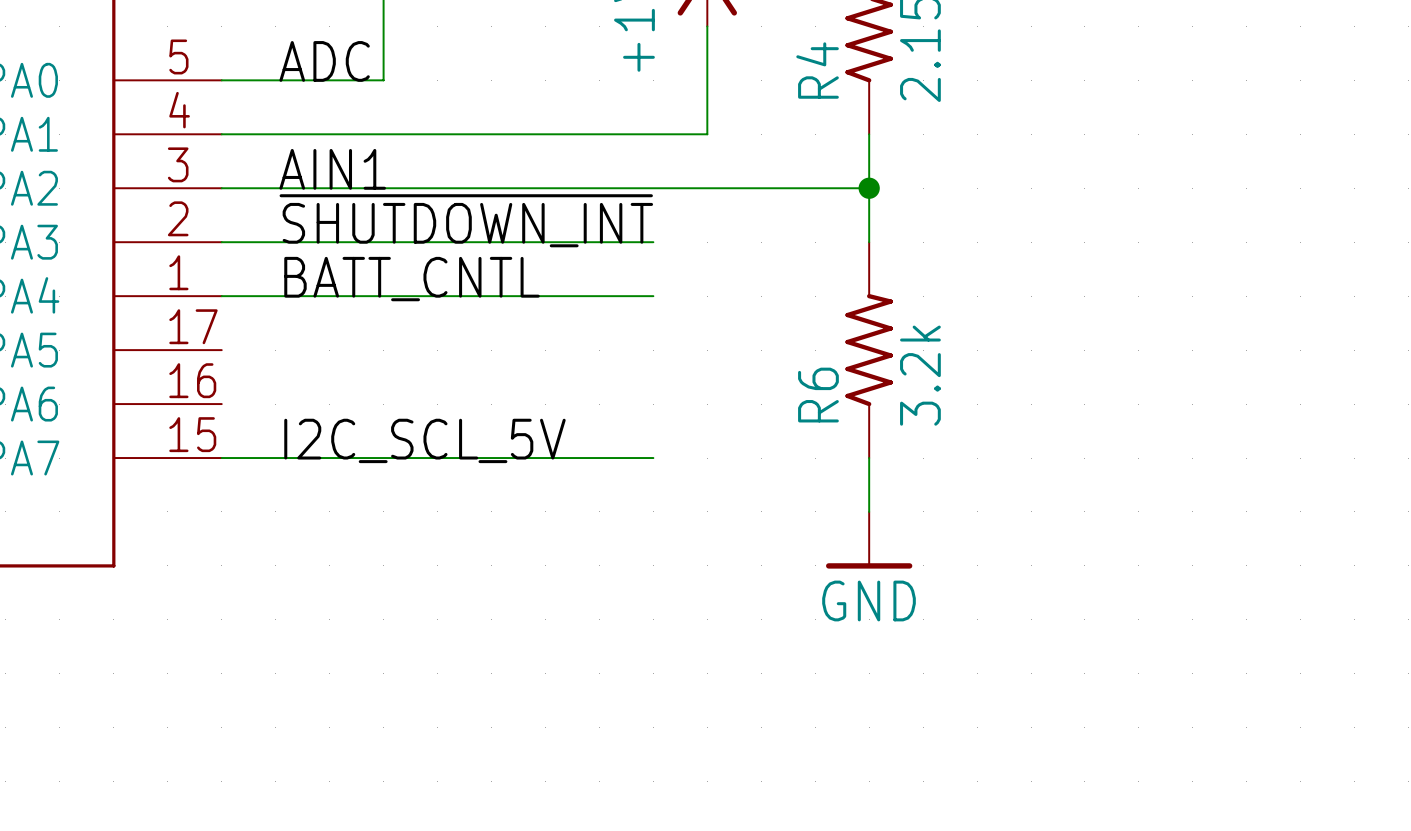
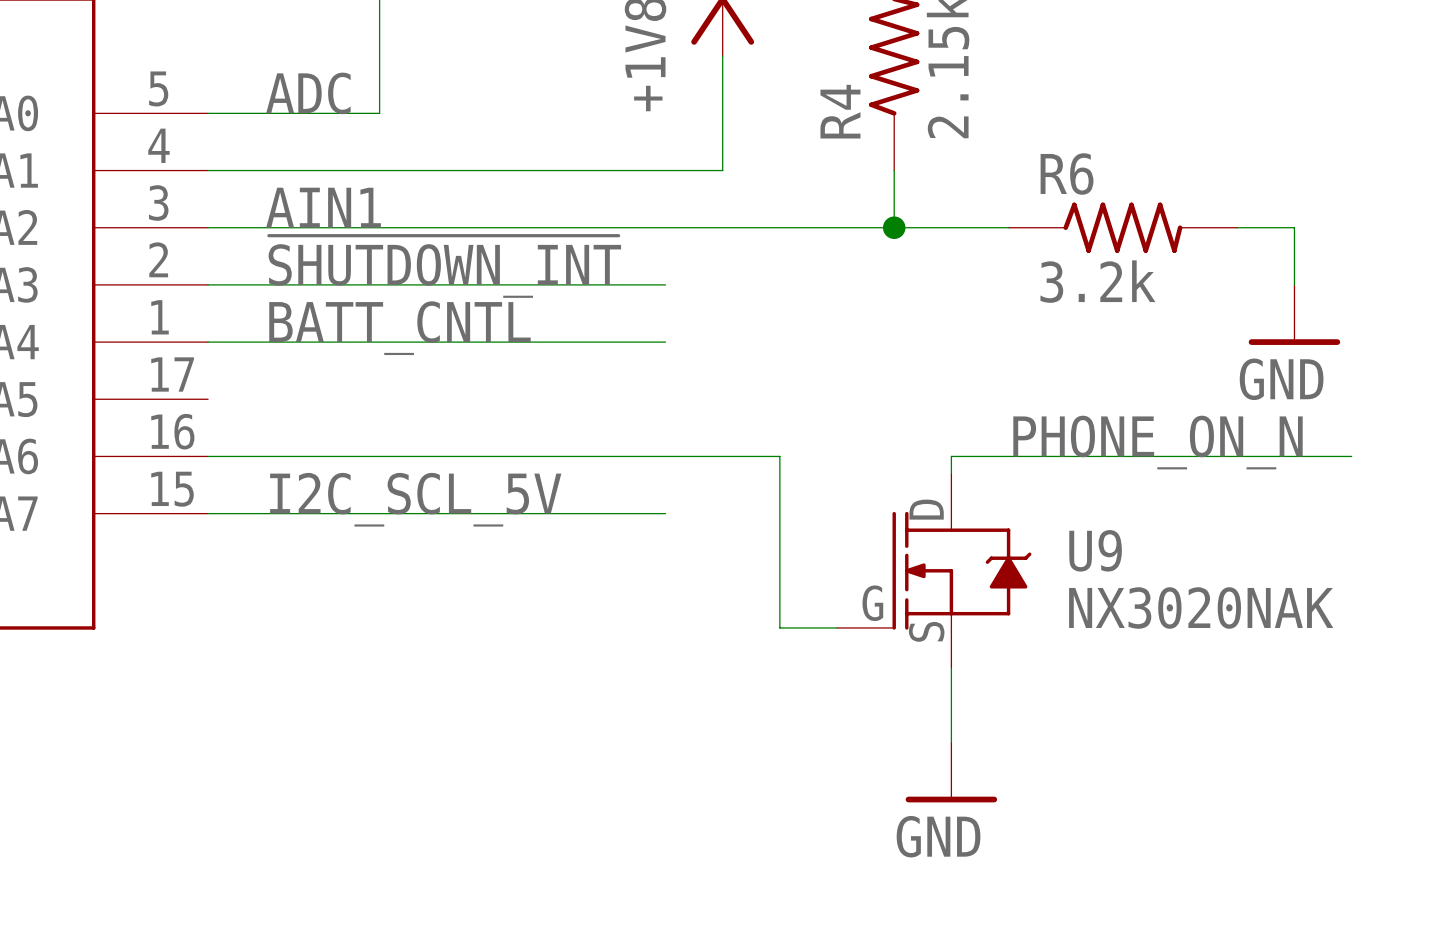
wire: (869, 188) (869, 242) -> (894, 227) (1008, 227)
wire: none -> (1237, 227) (1294, 227) (1294, 284)
power symbol: none -> GND (1294, 314)
R6 rotation: 0° (869, 350) -> 90° clockwise (1122, 227)
R6 position: (869, 350) -> (1122, 227)
label: none -> PHONE_ON_N (1158, 442)
wire: none -> (208, 456) (779, 456) (779, 627) (837, 627)
wire: none -> (1351, 456) (951, 456) (951, 473)
U9: none -> (934, 570)
power symbol position: GND (869, 540) -> GND (951, 772)
wire: none -> (951, 668) (951, 742)

